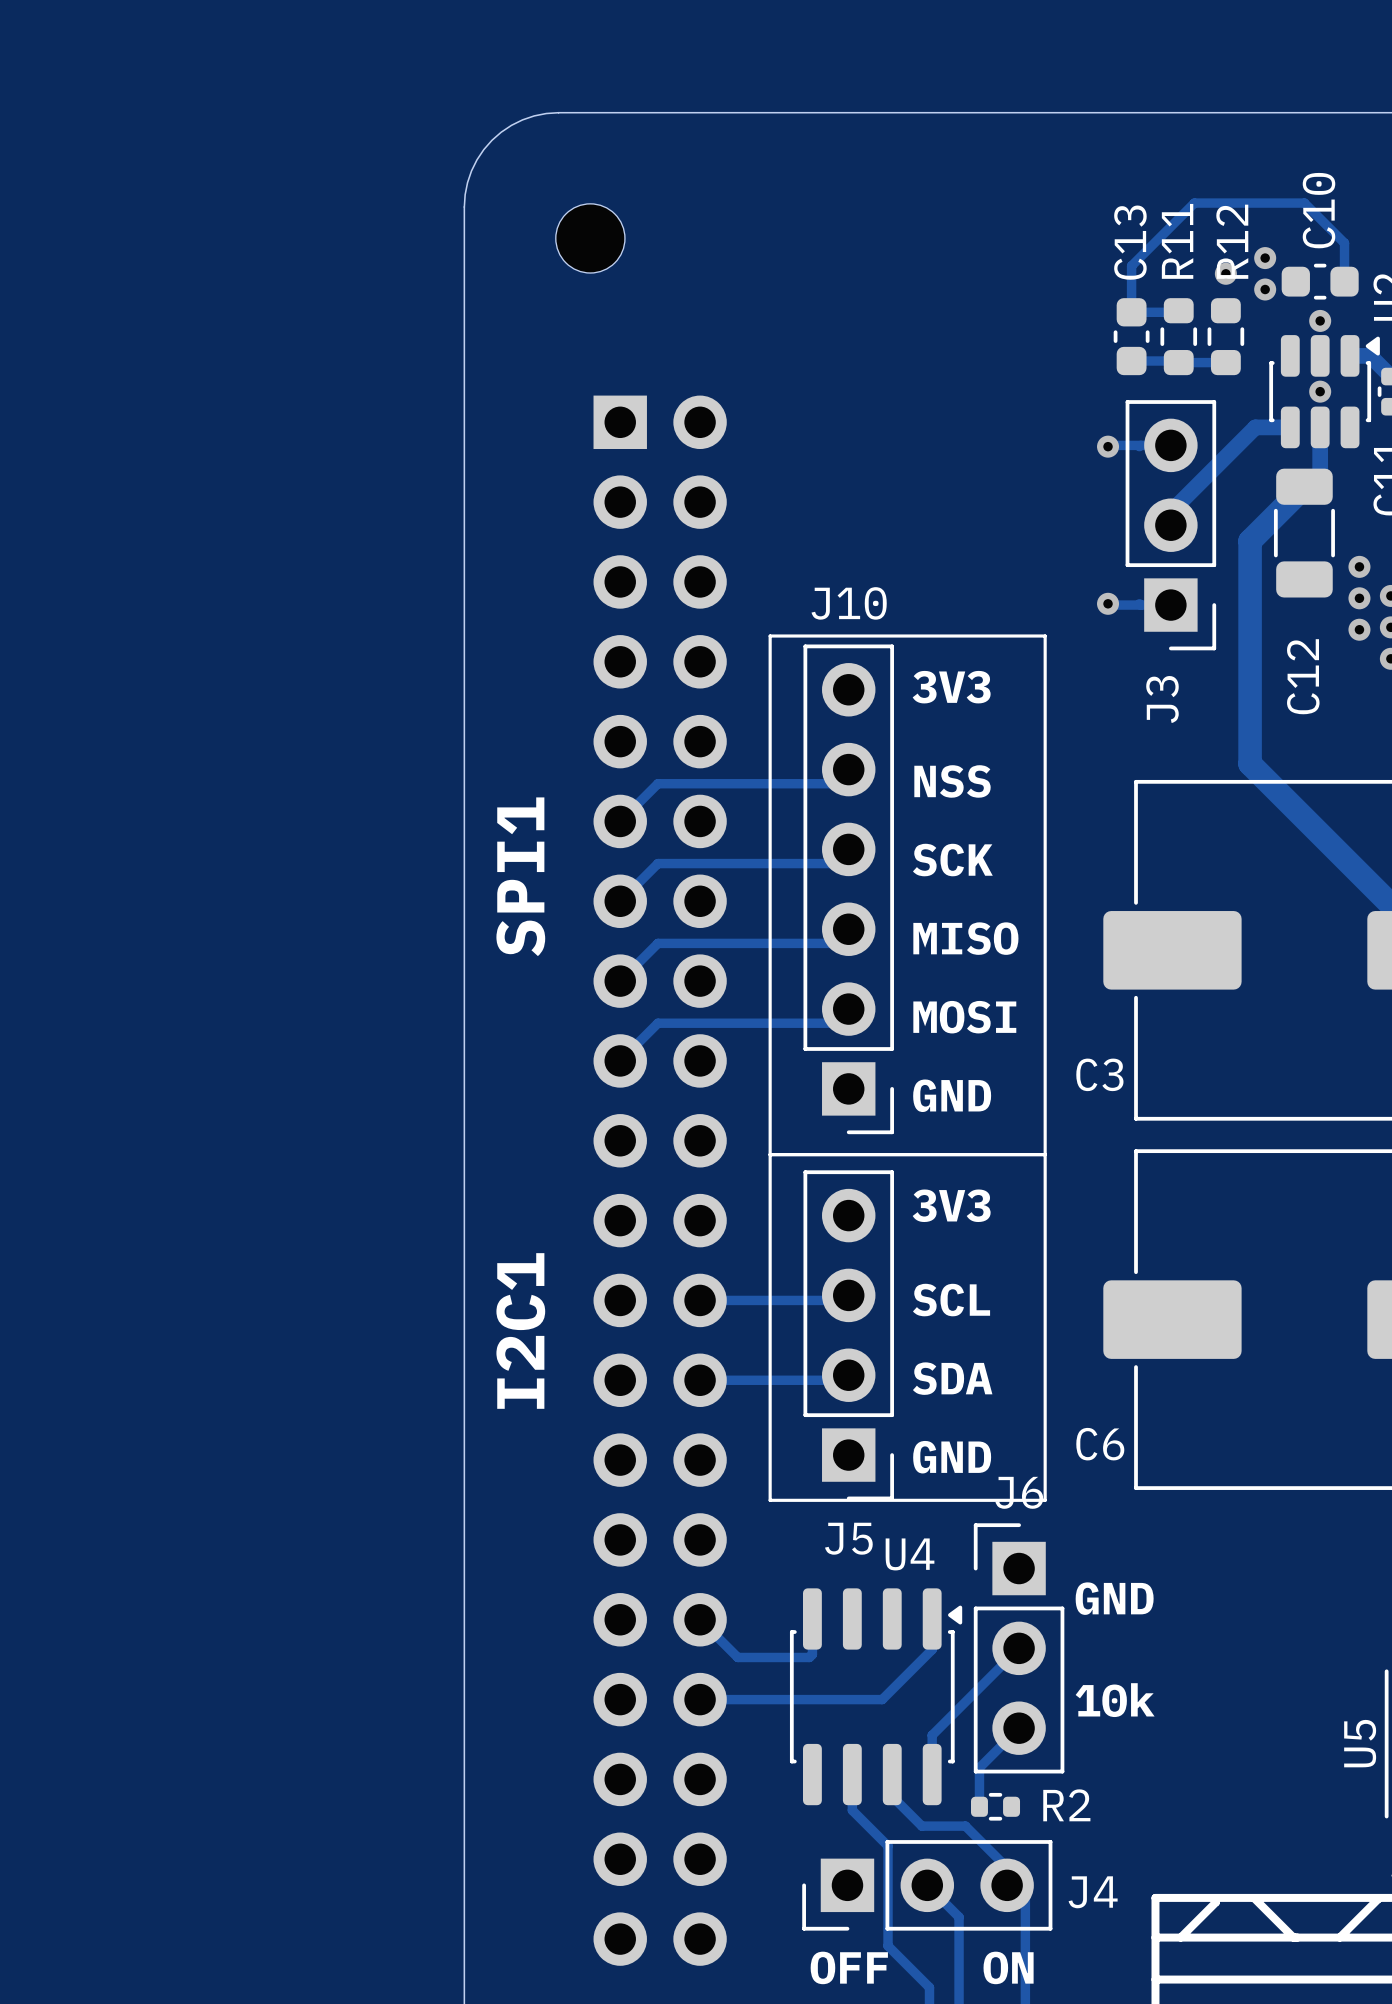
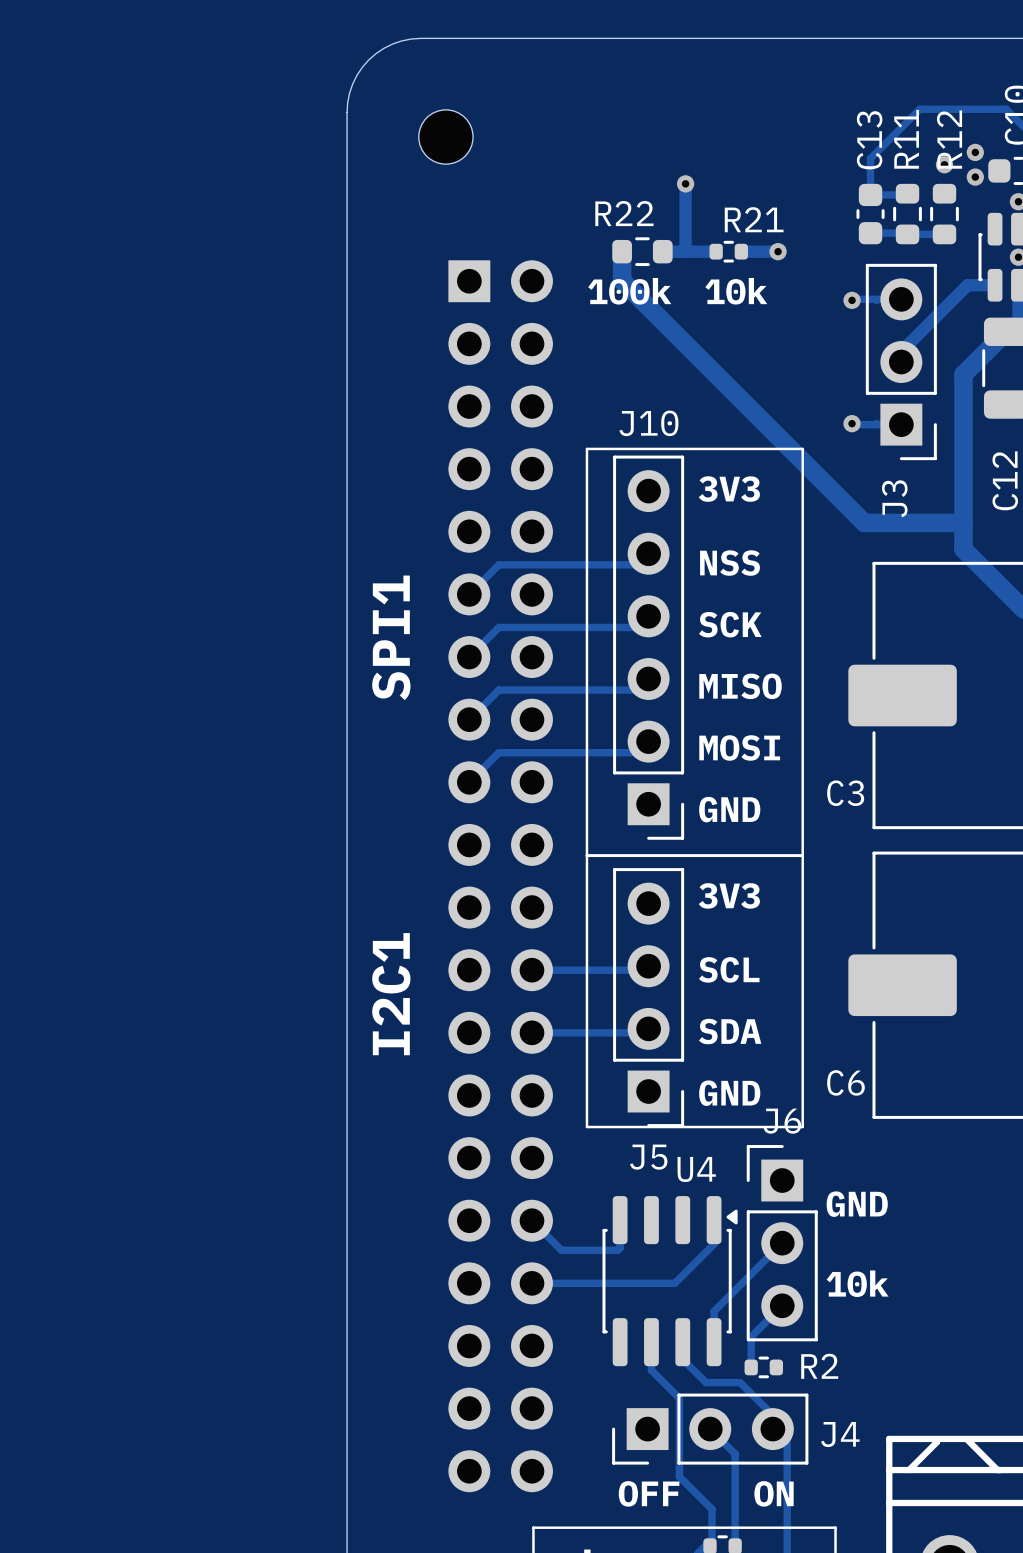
track: none -> (685, 183) (685, 251)
via: none -> (685, 183)
track: none -> (622, 251) (622, 280) (864, 522) (963, 522)
R22: none -> (642, 251)
track: none -> (666, 251) (712, 251)
R21: none -> (728, 251)
track: none -> (741, 251) (778, 251)
via: none -> (778, 251)
text: none -> 100k (629, 291)
text: none -> 10k (736, 291)

